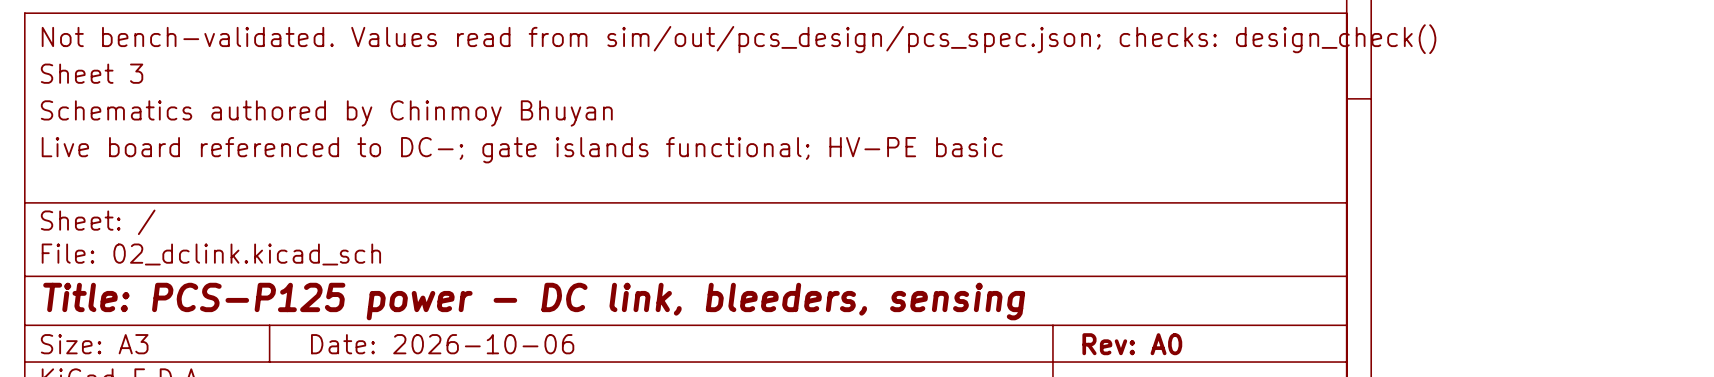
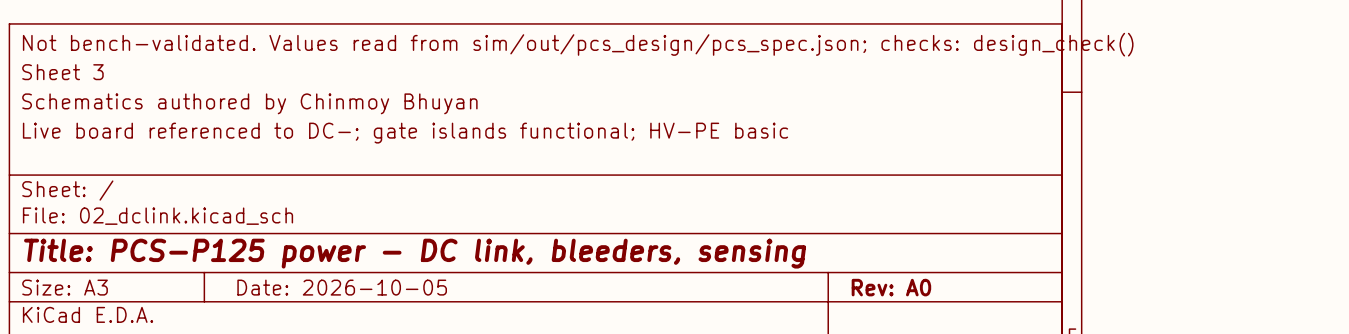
title block: Date: 2026-10-06 (442, 344) -> Date: 2026-10-05 (342, 287)

